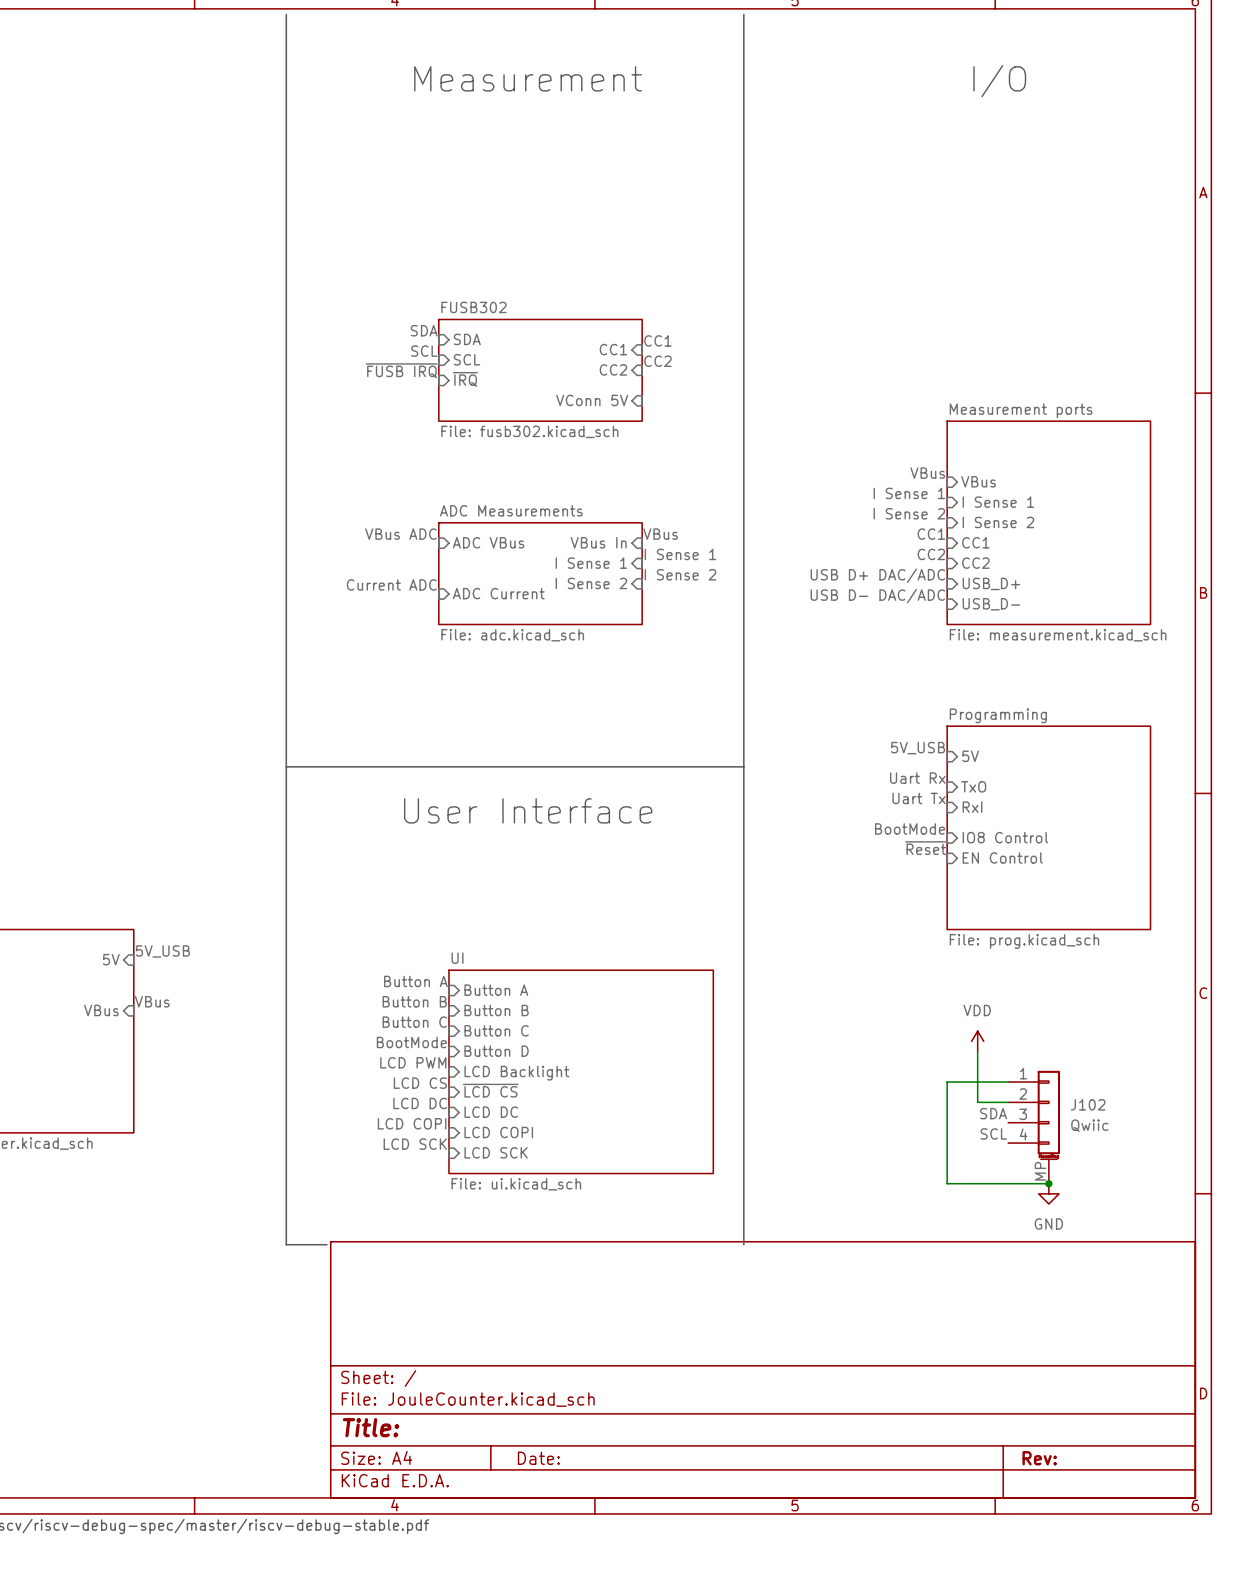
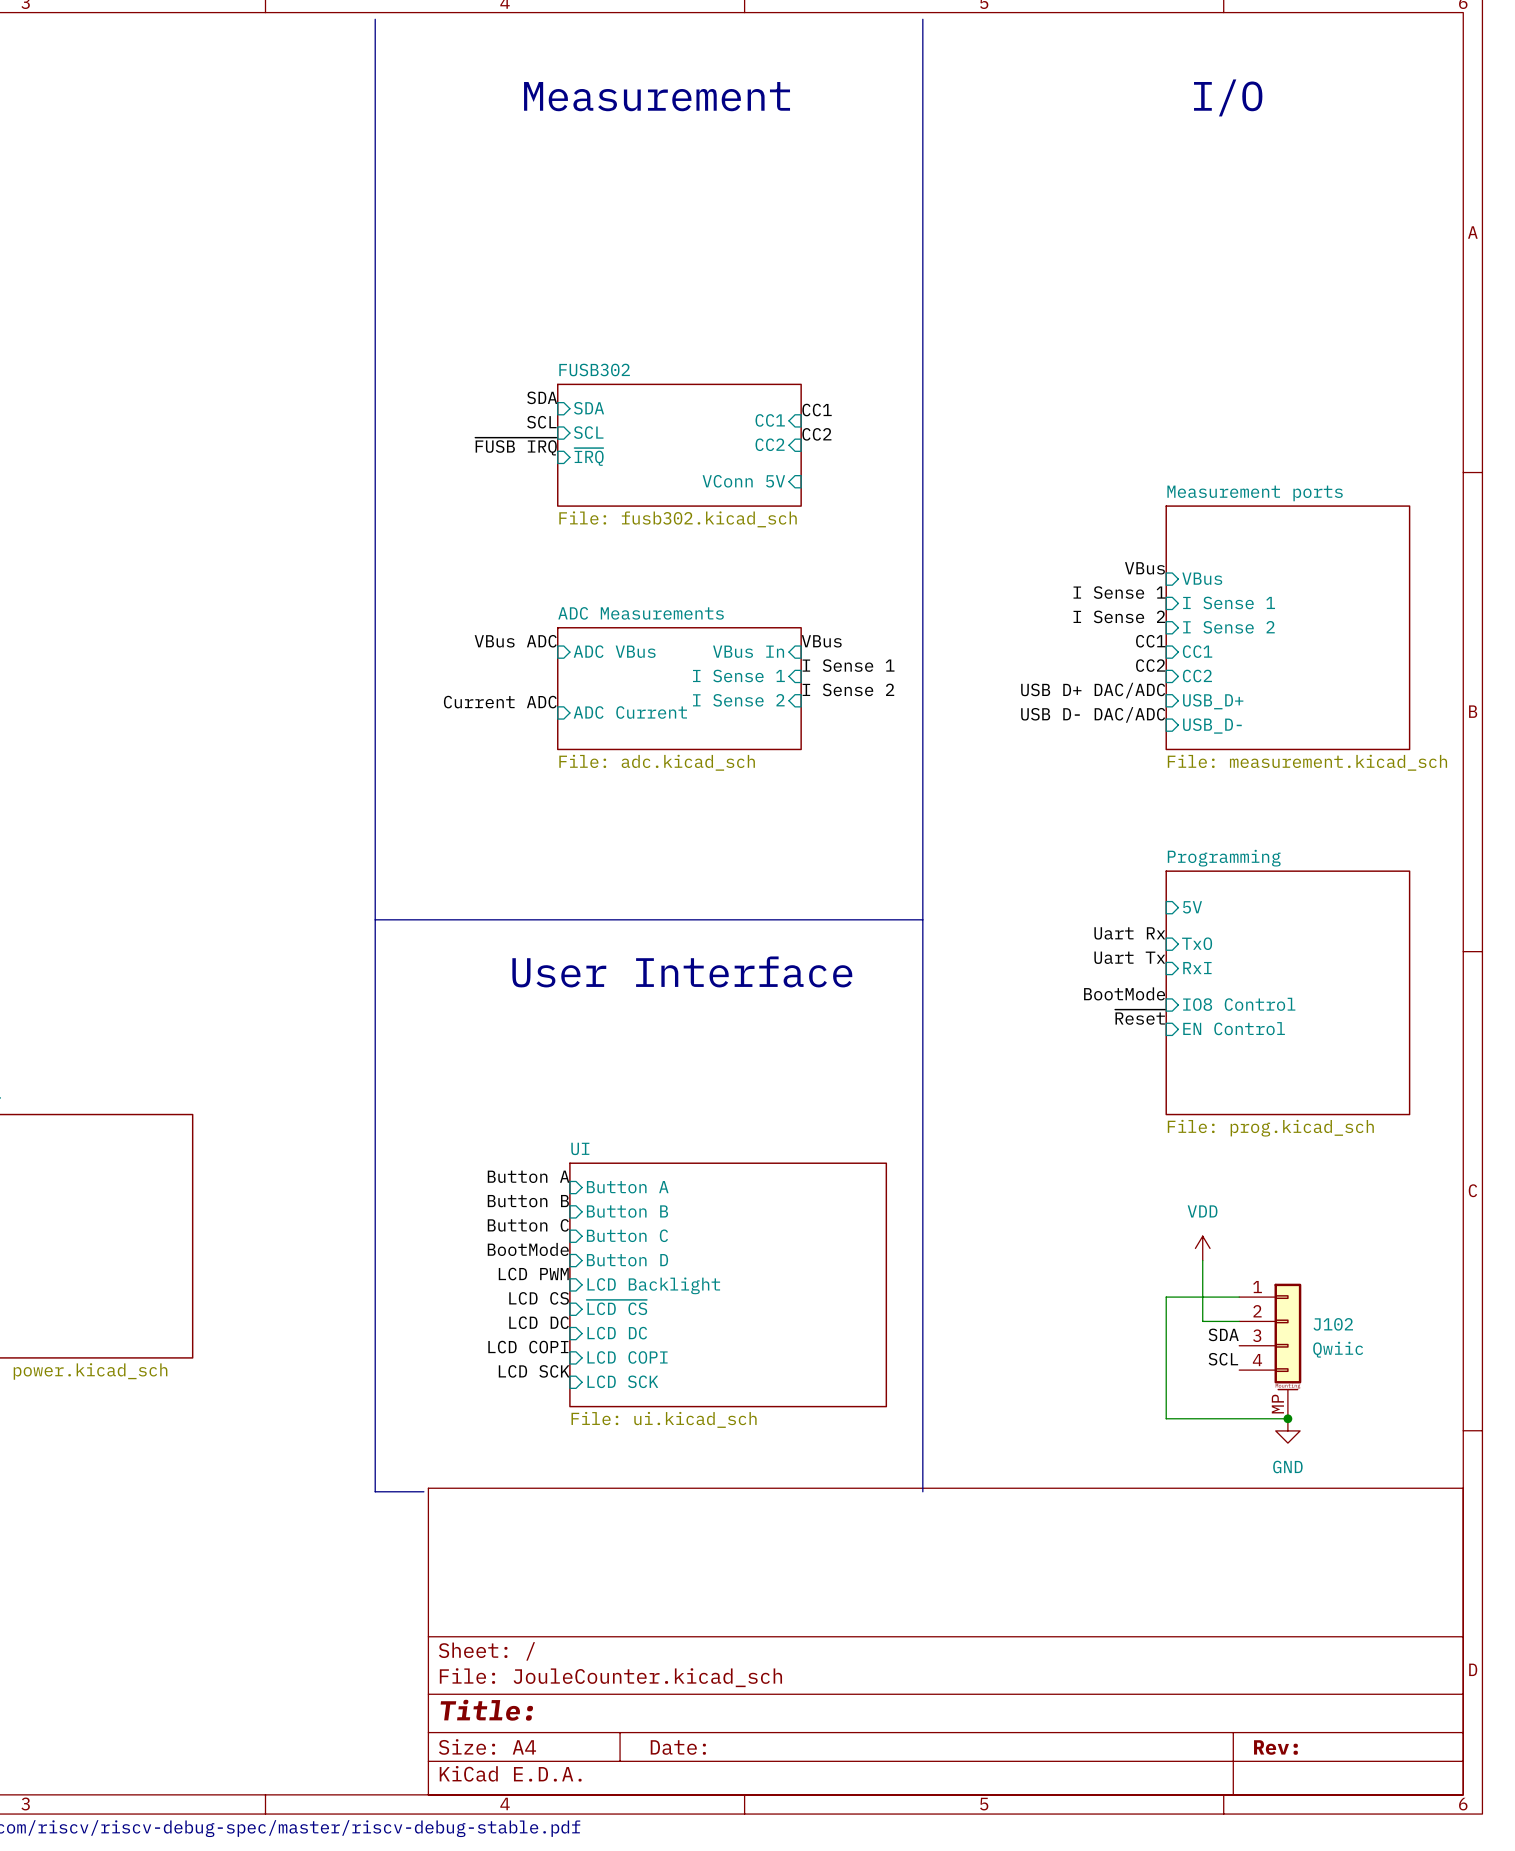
label: 5V_USB (918, 748) -> none
label: 5V_USB (162, 951) -> none
sheet pin: 5V (111, 959) -> none
label: VBus (152, 1001) -> none
sheet pin: VBus (101, 1010) -> none

